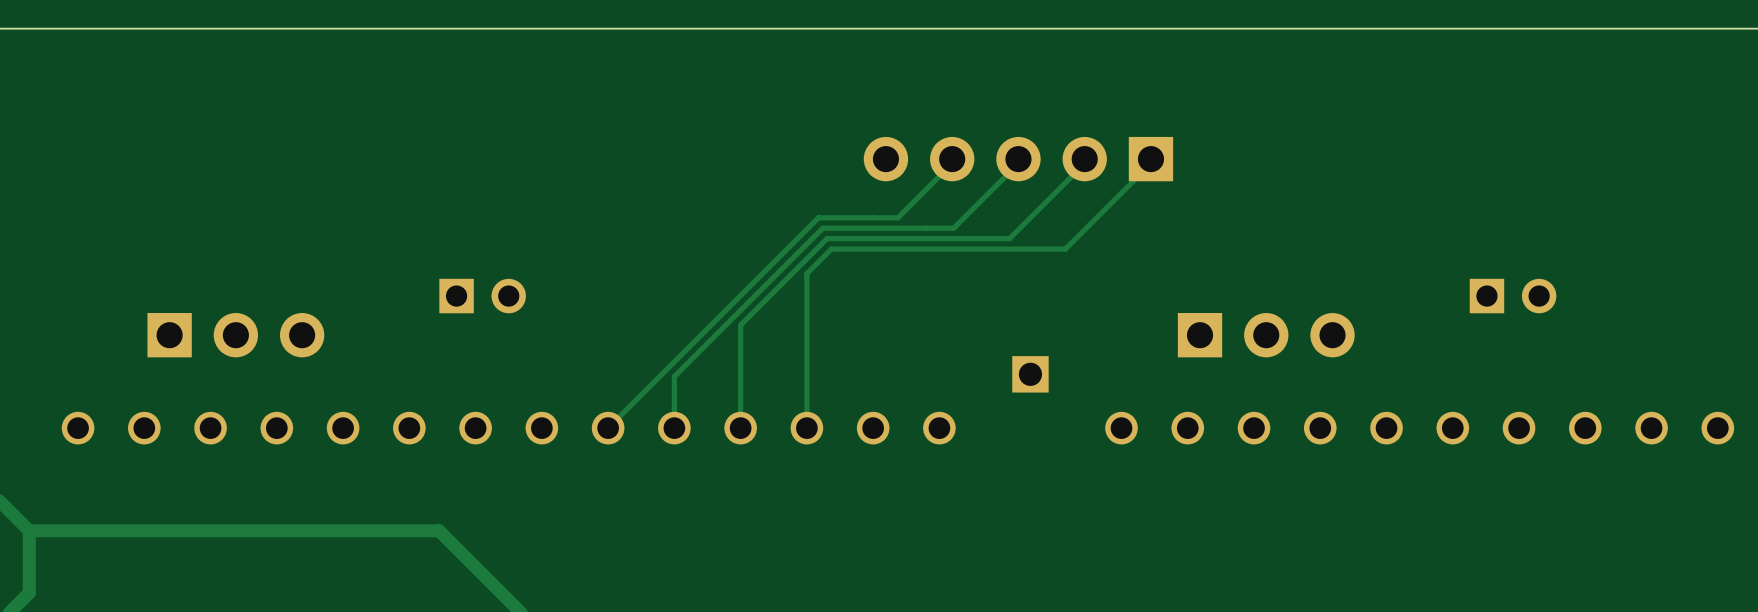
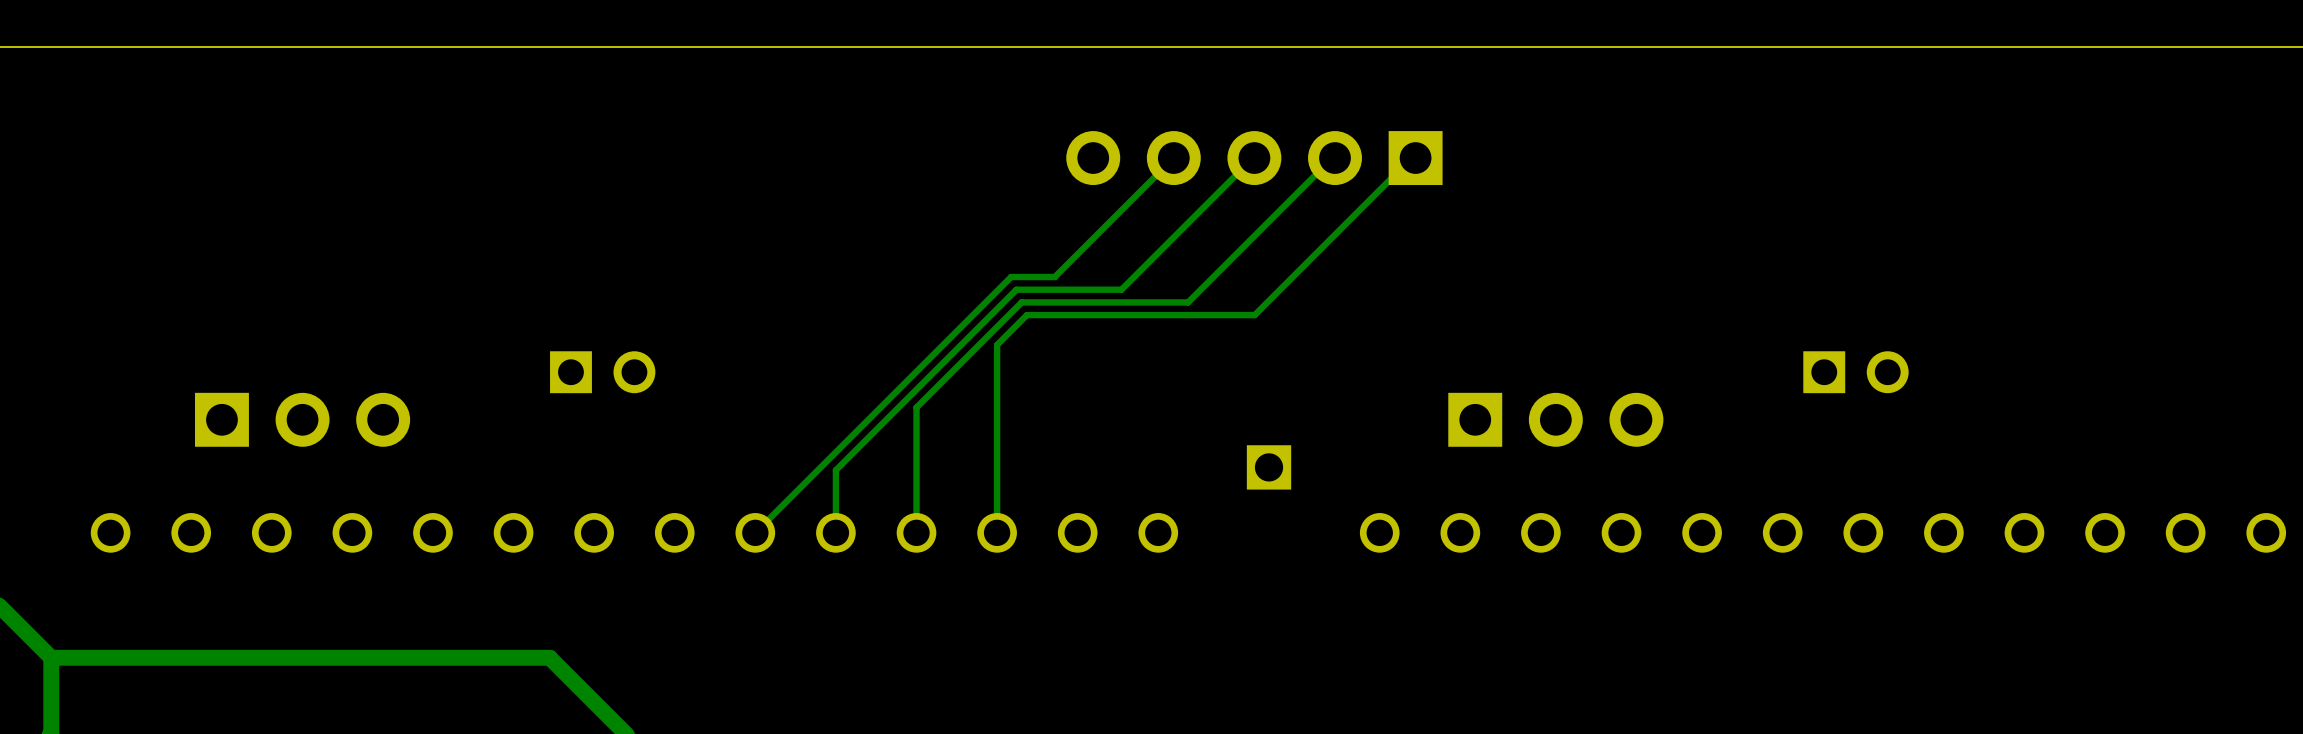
part position: (1018, 159) -> (1254, 158)
track: (950, 165) (897, 217) (854, 217) -> (1173, 158) (1054, 277)
track: (1016, 165) (953, 228) (909, 228) -> (1254, 158) (1121, 289)
track: (1082, 165) (1009, 238) (963, 238) -> (1335, 158) (1332, 158) (1188, 302)
track: (1148, 165) (1065, 249) (1018, 249) -> (1415, 158) (1411, 158) (1254, 315)

